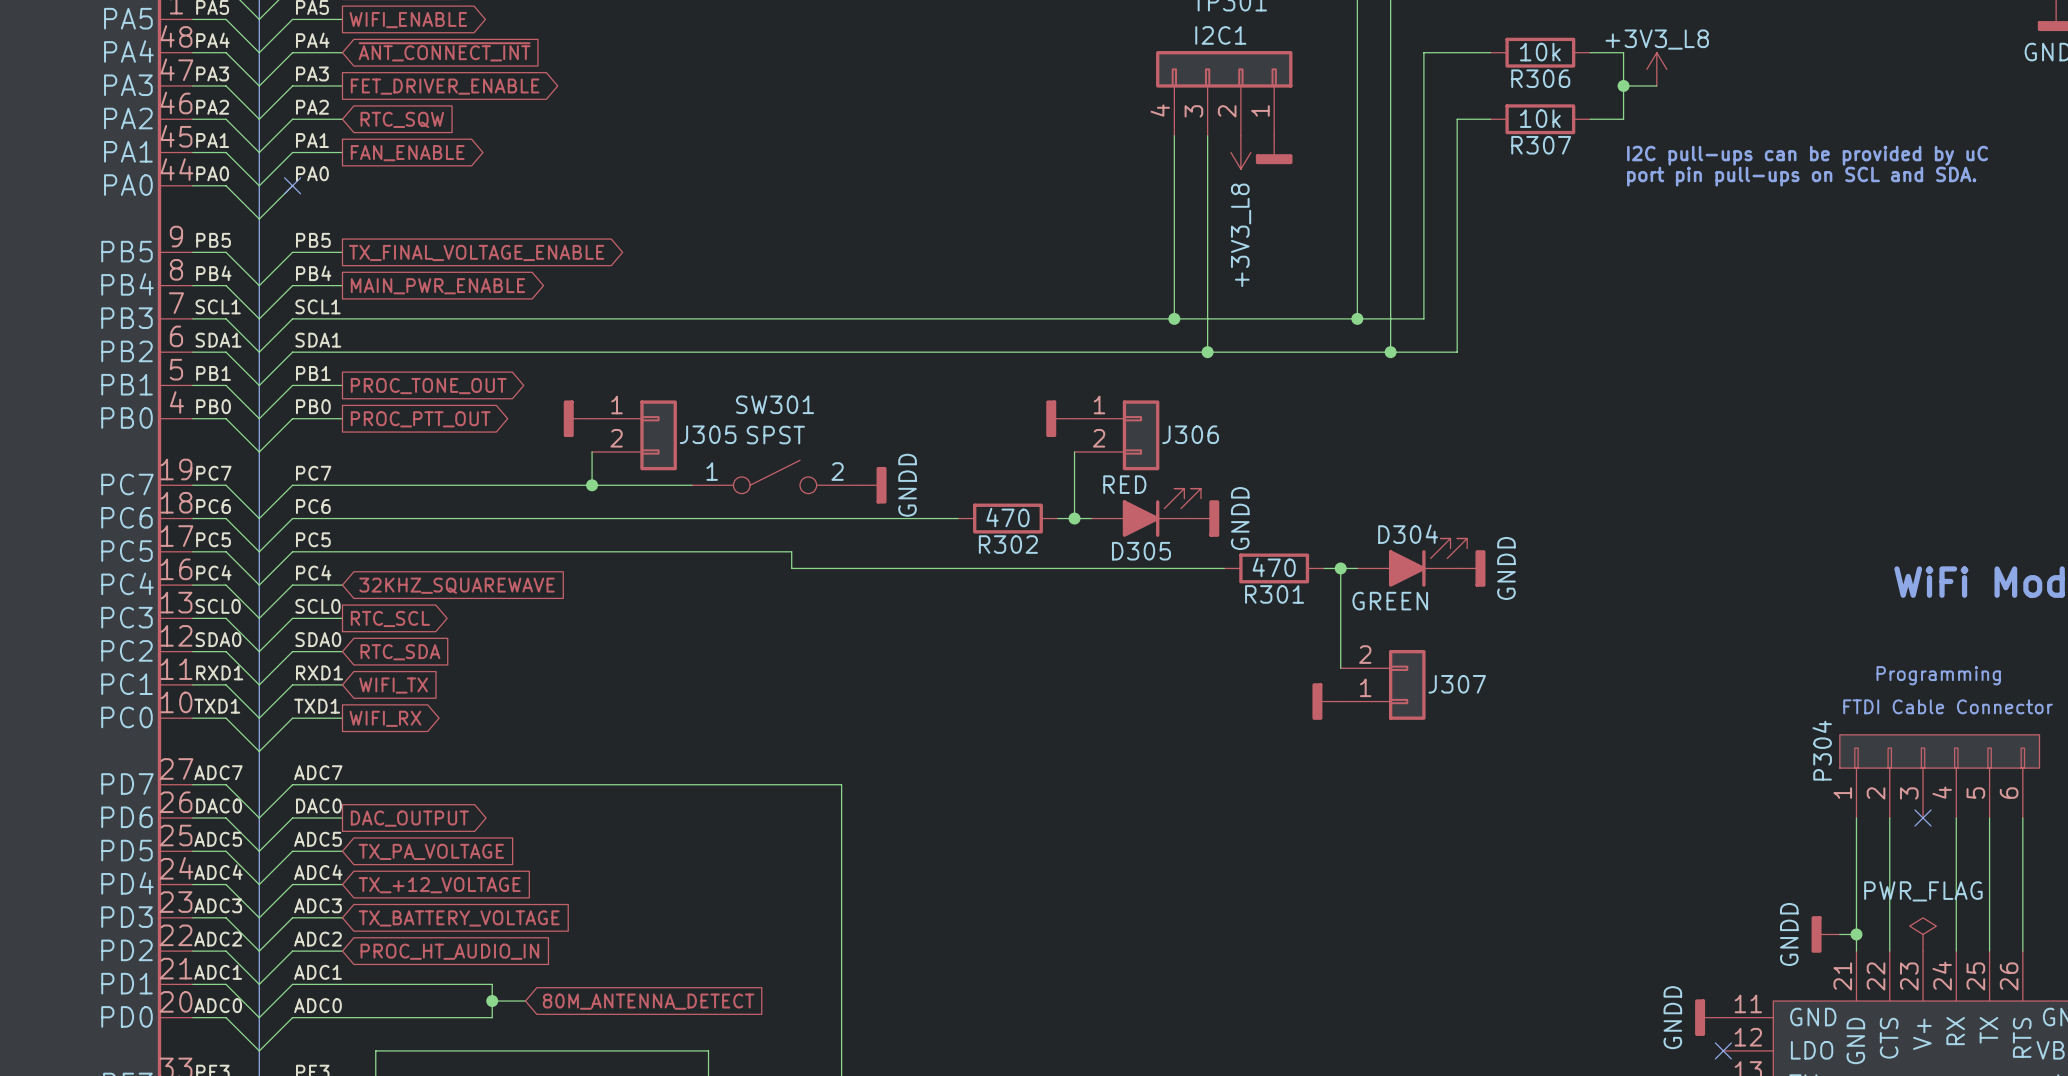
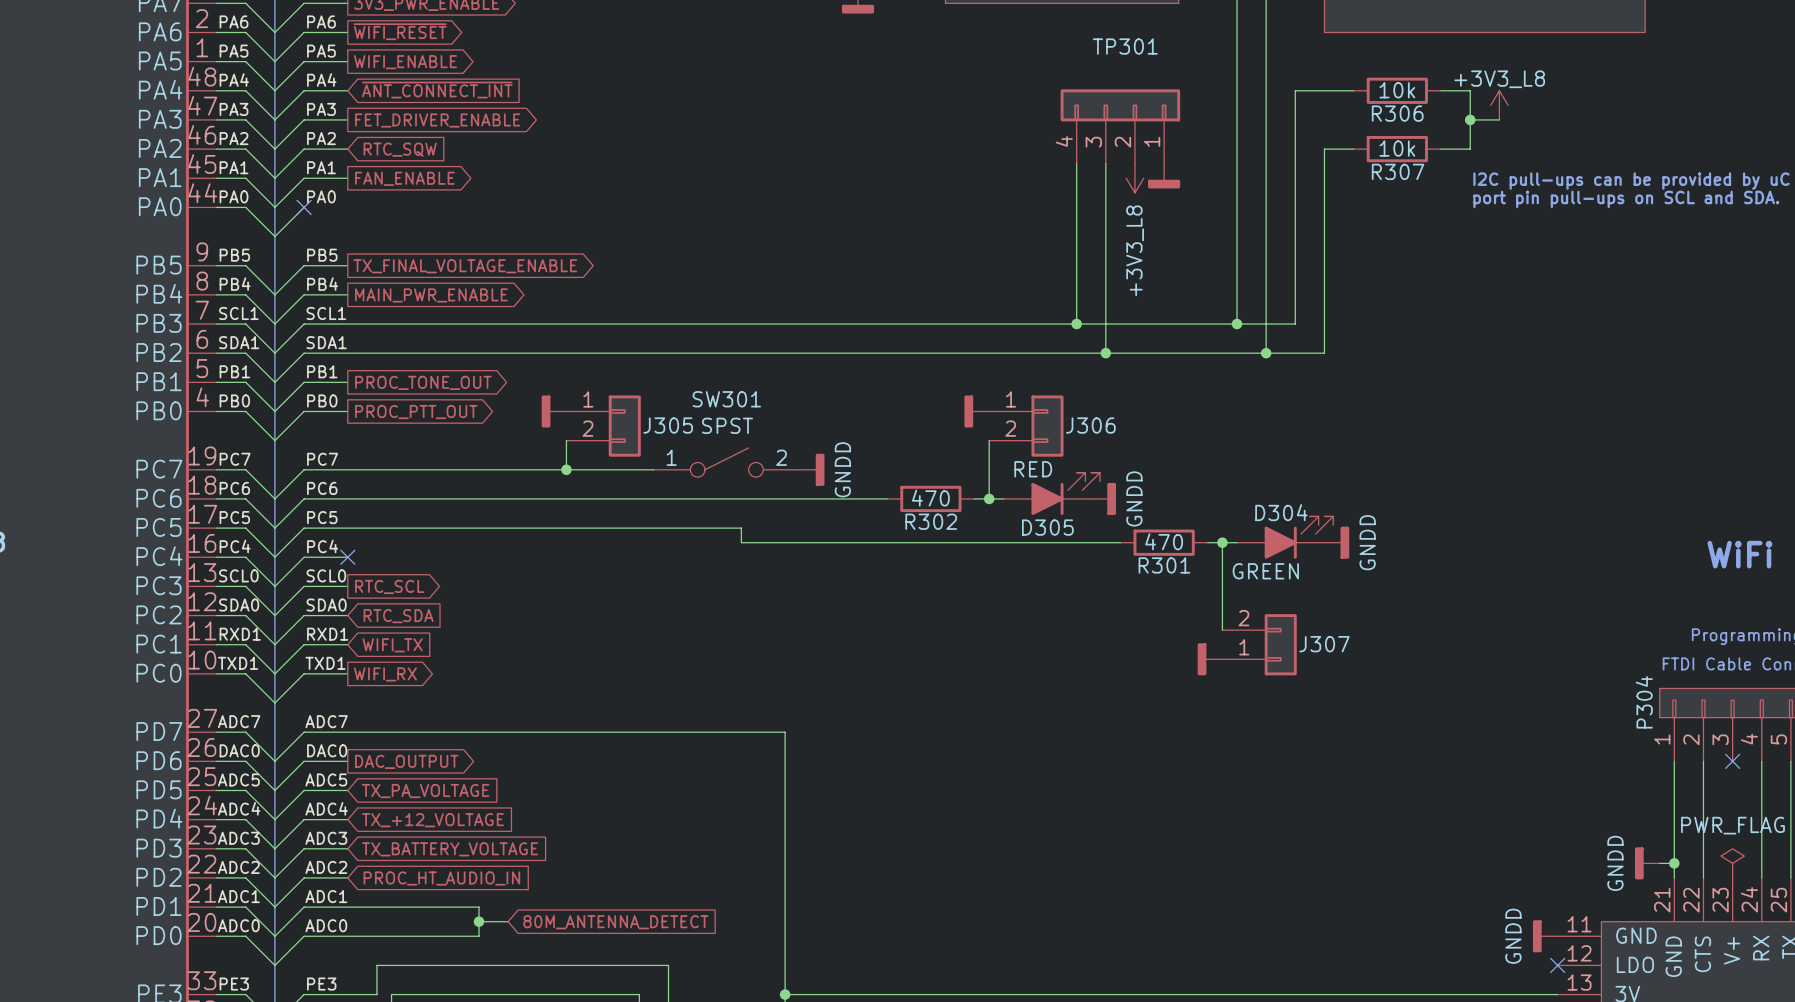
TP301 value: I2C1 (1220, 35) -> none
no-connect mark: none -> (347, 557)
global label: 32KHZ_SQUAREWAVE (456, 585) -> none

